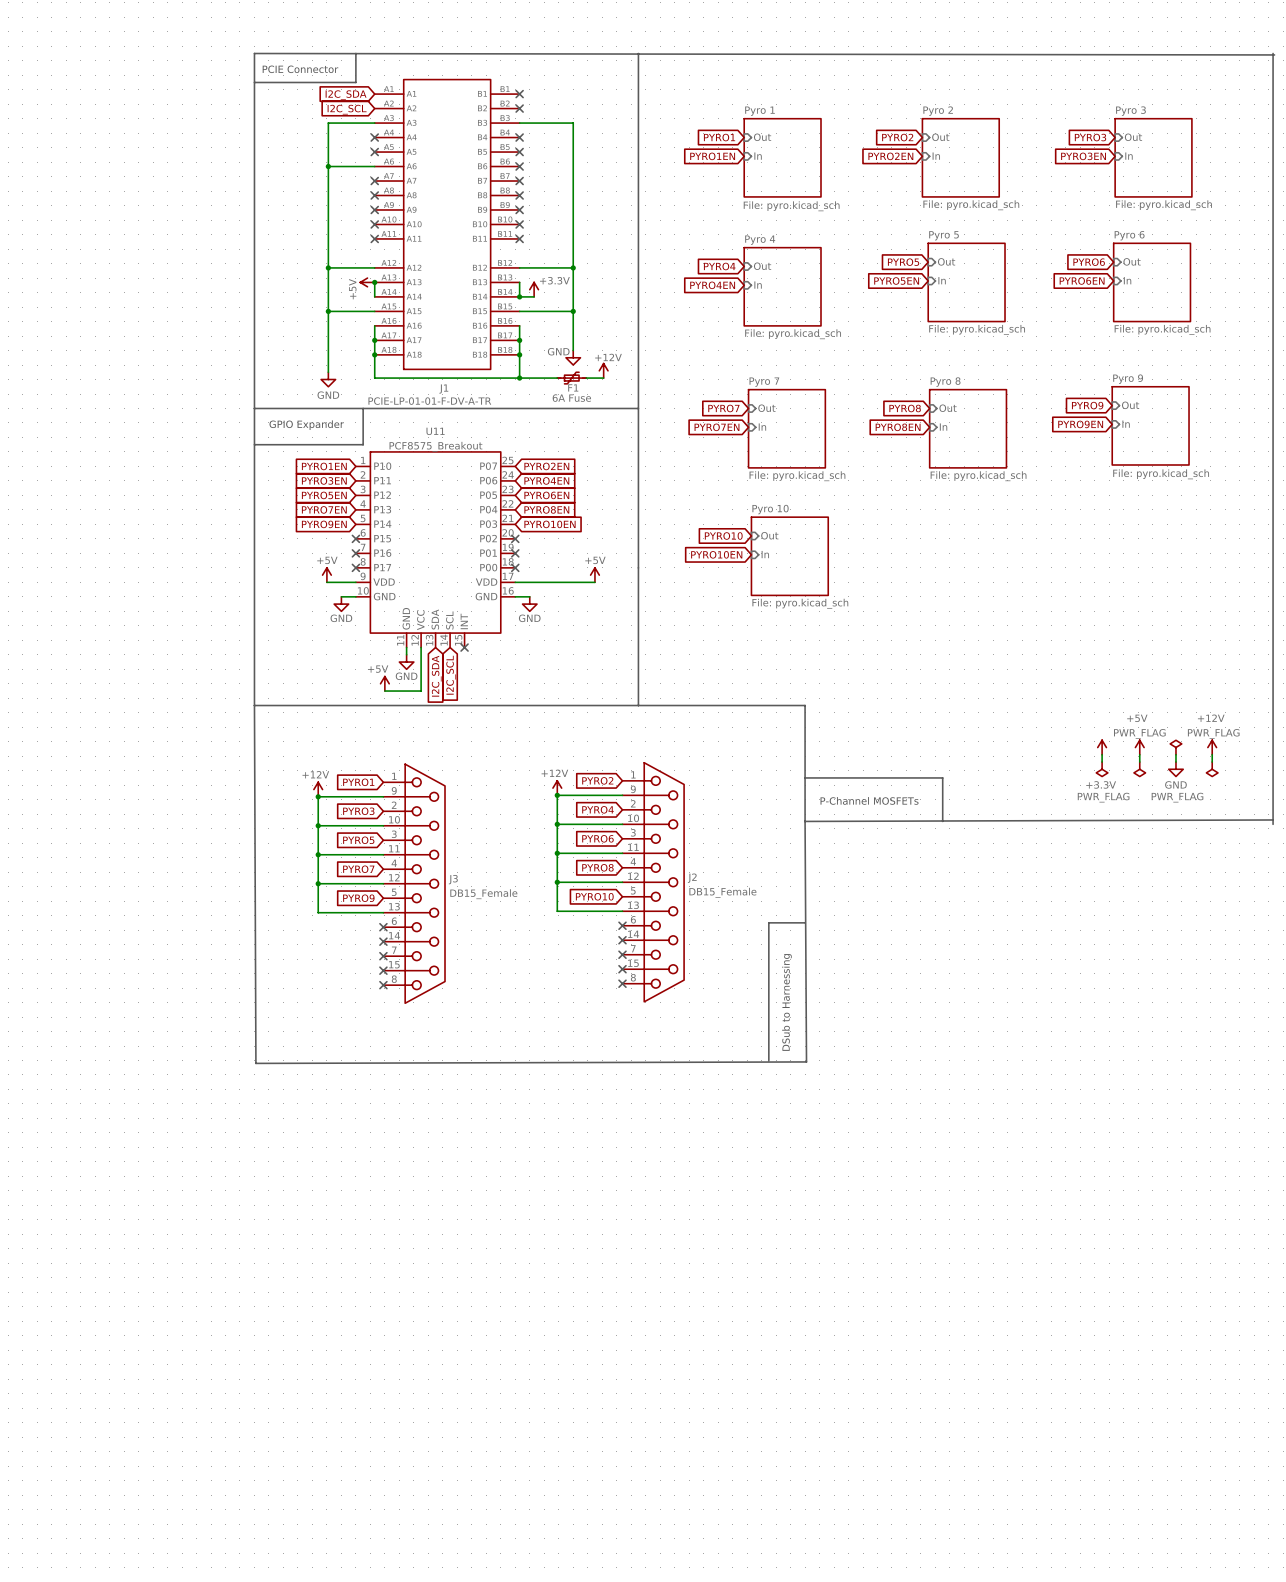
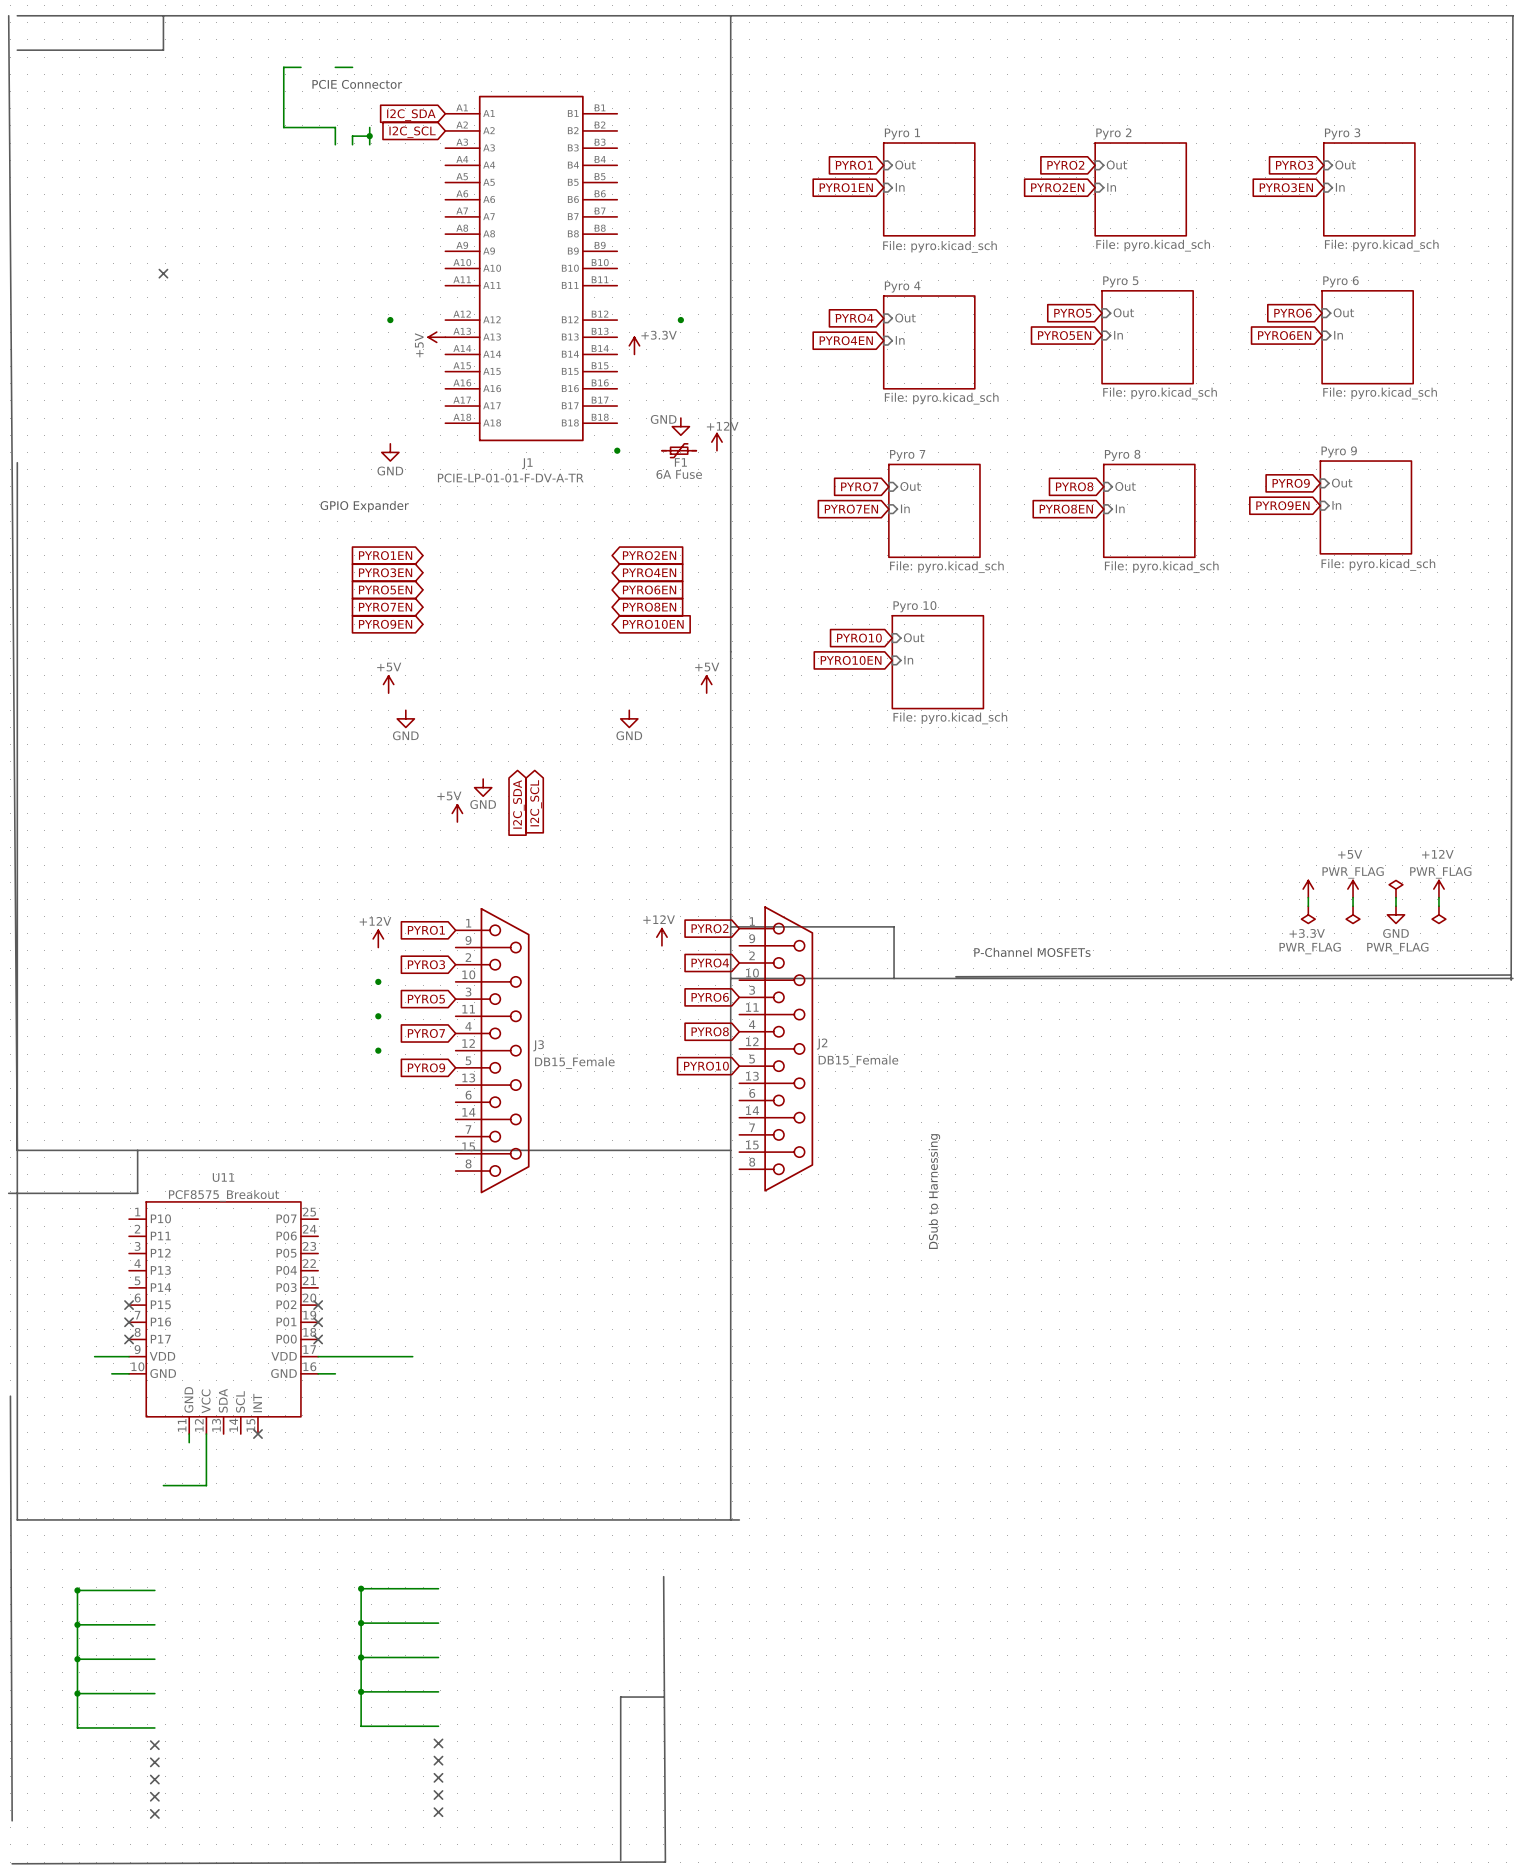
line: none -> (8, 15) (17, 1150) (730, 1150)
line: none -> (163, 15) (163, 50) (17, 50)
line: none -> (730, 15) (730, 1519)
line: (355, 53) (355, 82) (254, 82) -> none
line: (638, 53) (638, 705) -> none
line: (1273, 53) (1273, 824) -> (17, 15) (1512, 15) (1511, 980)
wire: none -> (300, 67) (283, 67) (283, 127) (335, 127) (335, 144)
wire: none -> (335, 67) (352, 67)
line: (1274, 54) (254, 53) (254, 705) -> none
no-connect mark: (519, 94) -> none
wire: none -> (369, 127) (369, 144)
no-connect mark: (519, 108) -> none
wire: none -> (369, 136) (352, 136) (352, 144)
junction: none -> (369, 136)
wire: (374, 123) (328, 123) (328, 372) -> none
wire: (519, 123) (573, 123) (573, 350) -> none
no-connect mark: (374, 137) -> none
no-connect mark: (519, 137) -> none
no-connect mark: (374, 152) -> none
no-connect mark: (519, 152) -> none
wire: (328, 166) (374, 166) -> none
junction: (328, 166) -> none
no-connect mark: (519, 166) -> none
no-connect mark: (374, 181) -> none
no-connect mark: (519, 181) -> none
no-connect mark: (374, 195) -> none
no-connect mark: (519, 195) -> none
no-connect mark: (374, 209) -> none
no-connect mark: (519, 209) -> none
no-connect mark: (374, 224) -> none
no-connect mark: (519, 224) -> none
no-connect mark: none -> (163, 273)
no-connect mark: (374, 238) -> none
no-connect mark: (519, 238) -> none
wire: (328, 267) (374, 267) -> none
wire: (519, 267) (573, 267) -> none
wire: (374, 282) (374, 296) -> none
junction: (374, 282) -> none
wire: (519, 282) (519, 296) (534, 296) -> none
junction: (519, 296) -> none
wire: (328, 311) (374, 311) -> none
junction: (328, 311) -> none
wire: (519, 311) (573, 311) -> none
junction: (573, 311) -> none
wire: (374, 325) (374, 378) (557, 378) -> none
wire: (519, 325) (519, 378) -> none
junction: (374, 340) -> none
junction: (519, 340) -> none
junction: (374, 354) -> none
junction: (519, 354) -> none
wire: (586, 378) (603, 378) -> none
line: none -> (17, 462) (17, 1519) (739, 1519)
line: (254, 408) (638, 408) -> none
line: (363, 408) (363, 444) (254, 444) -> none
no-connect mark: (355, 538) -> none
no-connect mark: (515, 538) -> none
U11 position: (435, 549) -> (223, 1317)
no-connect mark: (355, 553) -> none
no-connect mark: (515, 553) -> none
no-connect mark: (355, 567) -> none
no-connect mark: (515, 567) -> none
wire: (326, 582) (355, 582) -> none
wire: (515, 582) (594, 582) -> none
wire: (341, 596) (355, 596) -> none
wire: (515, 596) (529, 596) -> none
wire: (406, 647) (406, 654) -> none
wire: (421, 647) (421, 691) (384, 691) -> none
no-connect mark: (464, 647) -> none
line: (254, 705) (805, 705) (806, 1061) (255, 1063) (254, 705) -> none
line: (805, 777) (942, 777) (942, 821) -> none
line: none -> (730, 926) (894, 926) (894, 978)
junction: (557, 795) -> none
wire: (622, 795) (557, 795) (557, 911) (622, 911) -> none
junction: (318, 796) -> none
wire: (383, 796) (318, 796) (318, 912) (383, 912) -> none
line: none -> (730, 978) (1512, 978)
wire: (557, 824) (622, 824) -> none
junction: (557, 824) -> none
wire: (318, 825) (383, 825) -> none
wire: (557, 853) (622, 853) -> none
junction: (557, 853) -> none
wire: (318, 854) (383, 854) -> none
wire: (557, 882) (622, 882) -> none
junction: (557, 882) -> none
wire: (318, 883) (383, 883) -> none
line: (805, 922) (768, 922) (768, 1060) -> none
no-connect mark: (622, 925) -> none
no-connect mark: (383, 927) -> none
no-connect mark: (622, 940) -> none
no-connect mark: (383, 941) -> none
no-connect mark: (622, 954) -> none
no-connect mark: (383, 956) -> none
line: none -> (137, 1150) (137, 1193) (8, 1193)
no-connect mark: (622, 969) -> none
no-connect mark: (383, 970) -> none
no-connect mark: (622, 983) -> none
no-connect mark: (383, 985) -> none
no-connect mark: none -> (129, 1305)
no-connect mark: none -> (318, 1305)
no-connect mark: none -> (129, 1322)
no-connect mark: none -> (318, 1322)
no-connect mark: none -> (129, 1339)
no-connect mark: none -> (318, 1339)
wire: none -> (94, 1356) (129, 1356)
wire: none -> (318, 1356) (412, 1356)
wire: none -> (111, 1373) (129, 1373)
wire: none -> (318, 1373) (335, 1373)
line: none -> (10, 1396) (12, 1820)
wire: none -> (189, 1434) (189, 1442)
wire: none -> (206, 1434) (206, 1485) (163, 1485)
no-connect mark: none -> (257, 1434)
line: none -> (663, 1576) (665, 1862) (12, 1863)
junction: none -> (361, 1588)
wire: none -> (438, 1588) (361, 1588) (361, 1726) (438, 1726)
junction: none -> (77, 1590)
wire: none -> (154, 1590) (77, 1590) (77, 1727) (154, 1727)
wire: none -> (361, 1623) (438, 1623)
junction: none -> (361, 1623)
wire: none -> (77, 1624) (154, 1624)
junction: none -> (77, 1624)
wire: none -> (361, 1657) (438, 1657)
junction: none -> (361, 1657)
wire: none -> (77, 1659) (154, 1659)
junction: none -> (77, 1659)
wire: none -> (361, 1691) (438, 1691)
junction: none -> (361, 1691)
wire: none -> (77, 1693) (154, 1693)
junction: none -> (77, 1693)
line: none -> (663, 1697) (620, 1697) (620, 1860)
no-connect mark: none -> (438, 1743)
no-connect mark: none -> (154, 1745)
no-connect mark: none -> (438, 1760)
no-connect mark: none -> (154, 1762)
no-connect mark: none -> (438, 1777)
no-connect mark: none -> (154, 1779)
no-connect mark: none -> (438, 1795)
no-connect mark: none -> (154, 1796)
no-connect mark: none -> (438, 1812)
no-connect mark: none -> (154, 1813)

